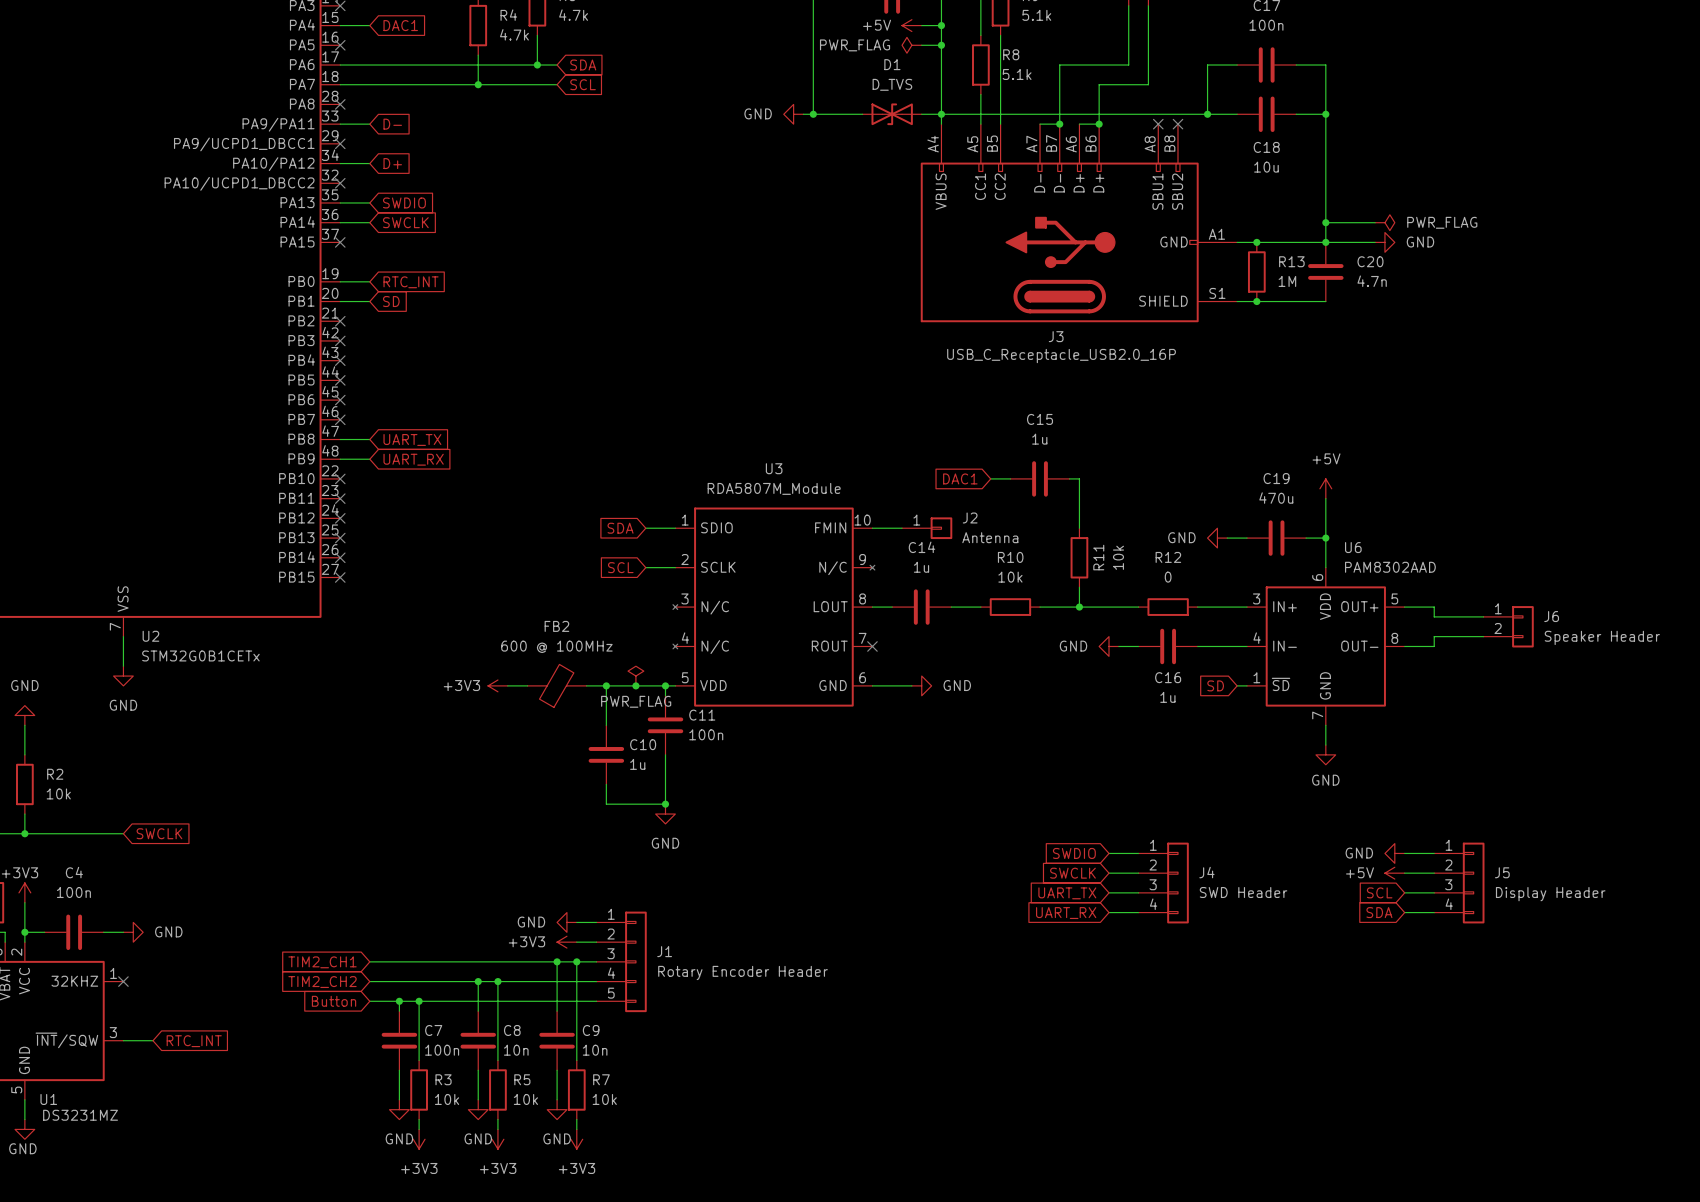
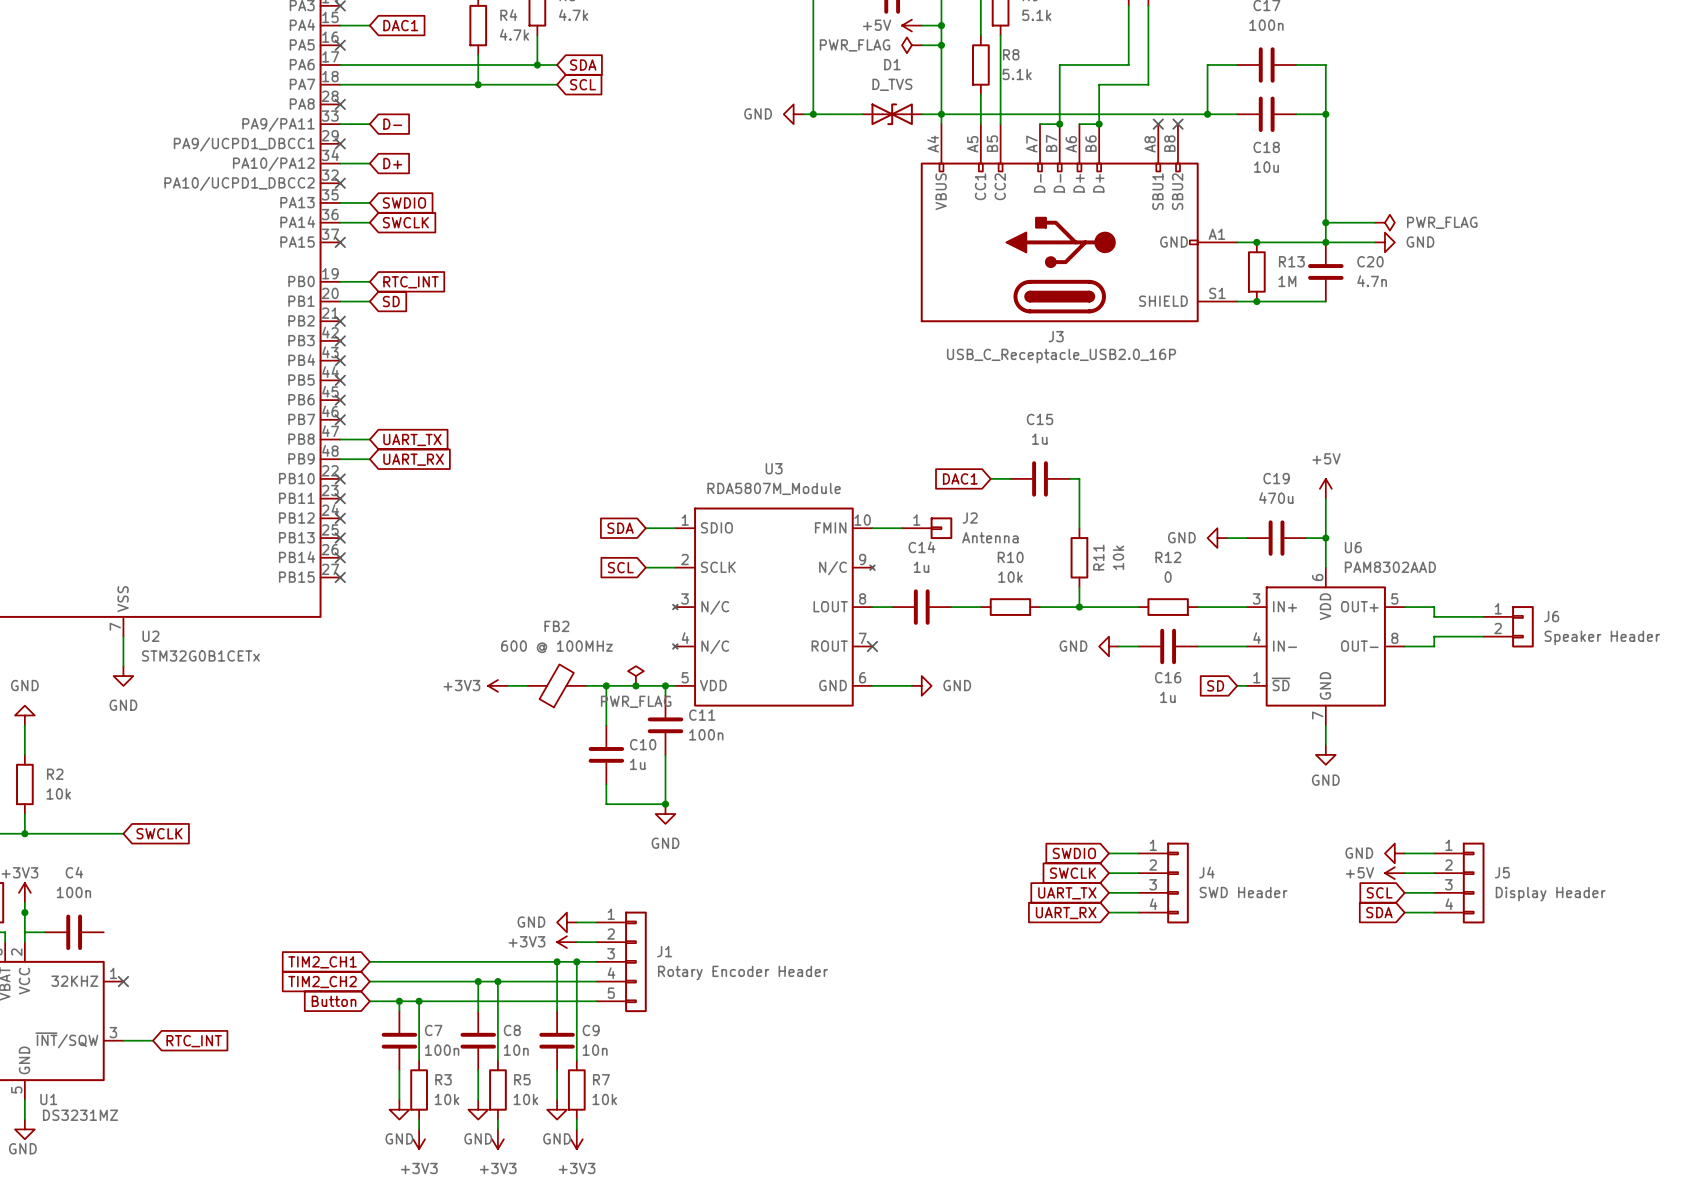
junction: none -> (24, 912)
junction: (24, 932) -> none
wire: (103, 932) (123, 932) -> none
power symbol: GND (133, 932) -> none

